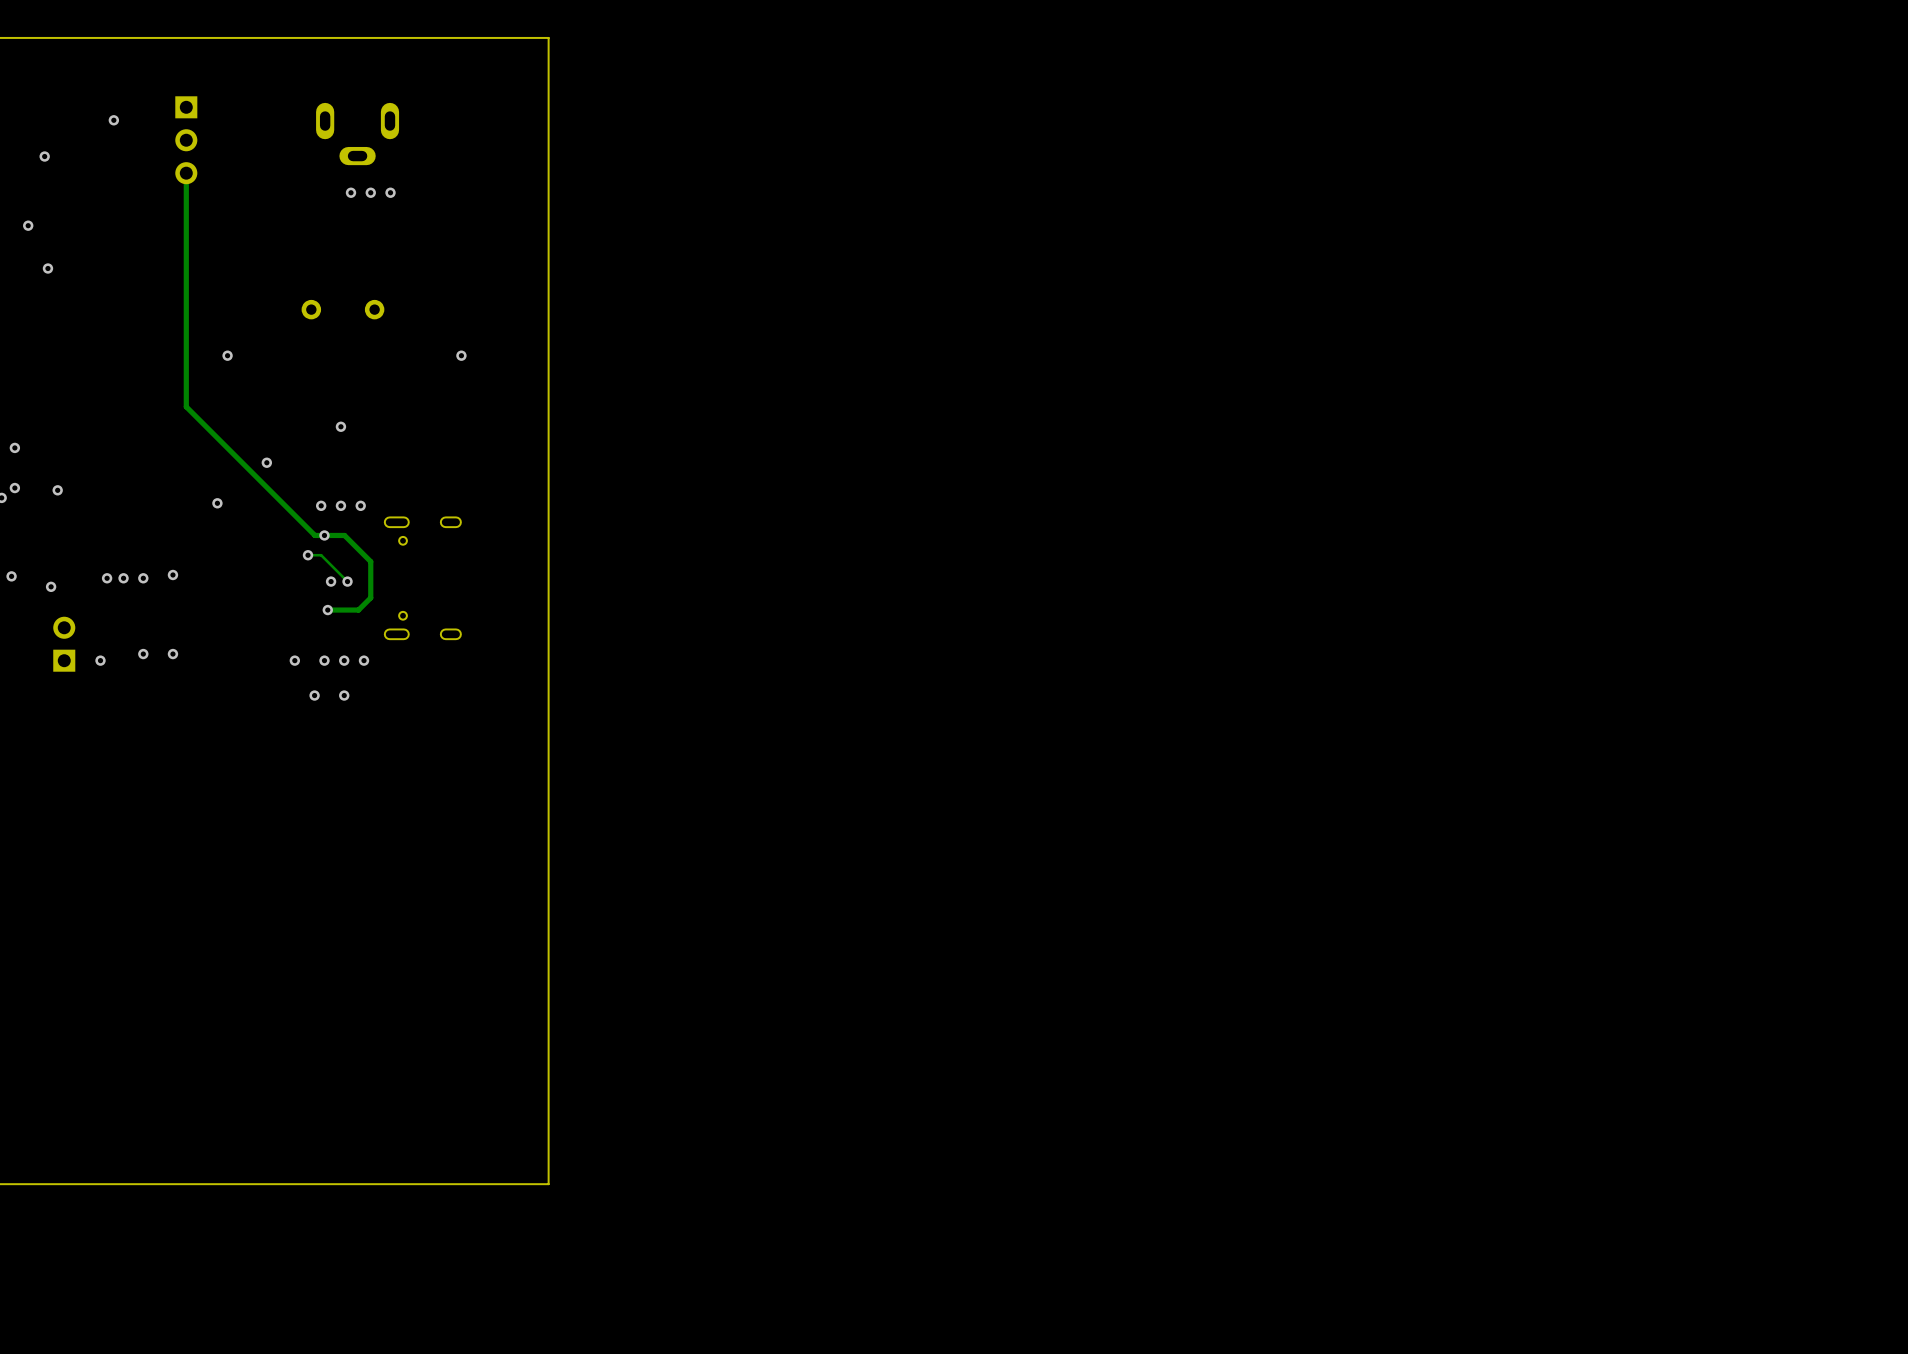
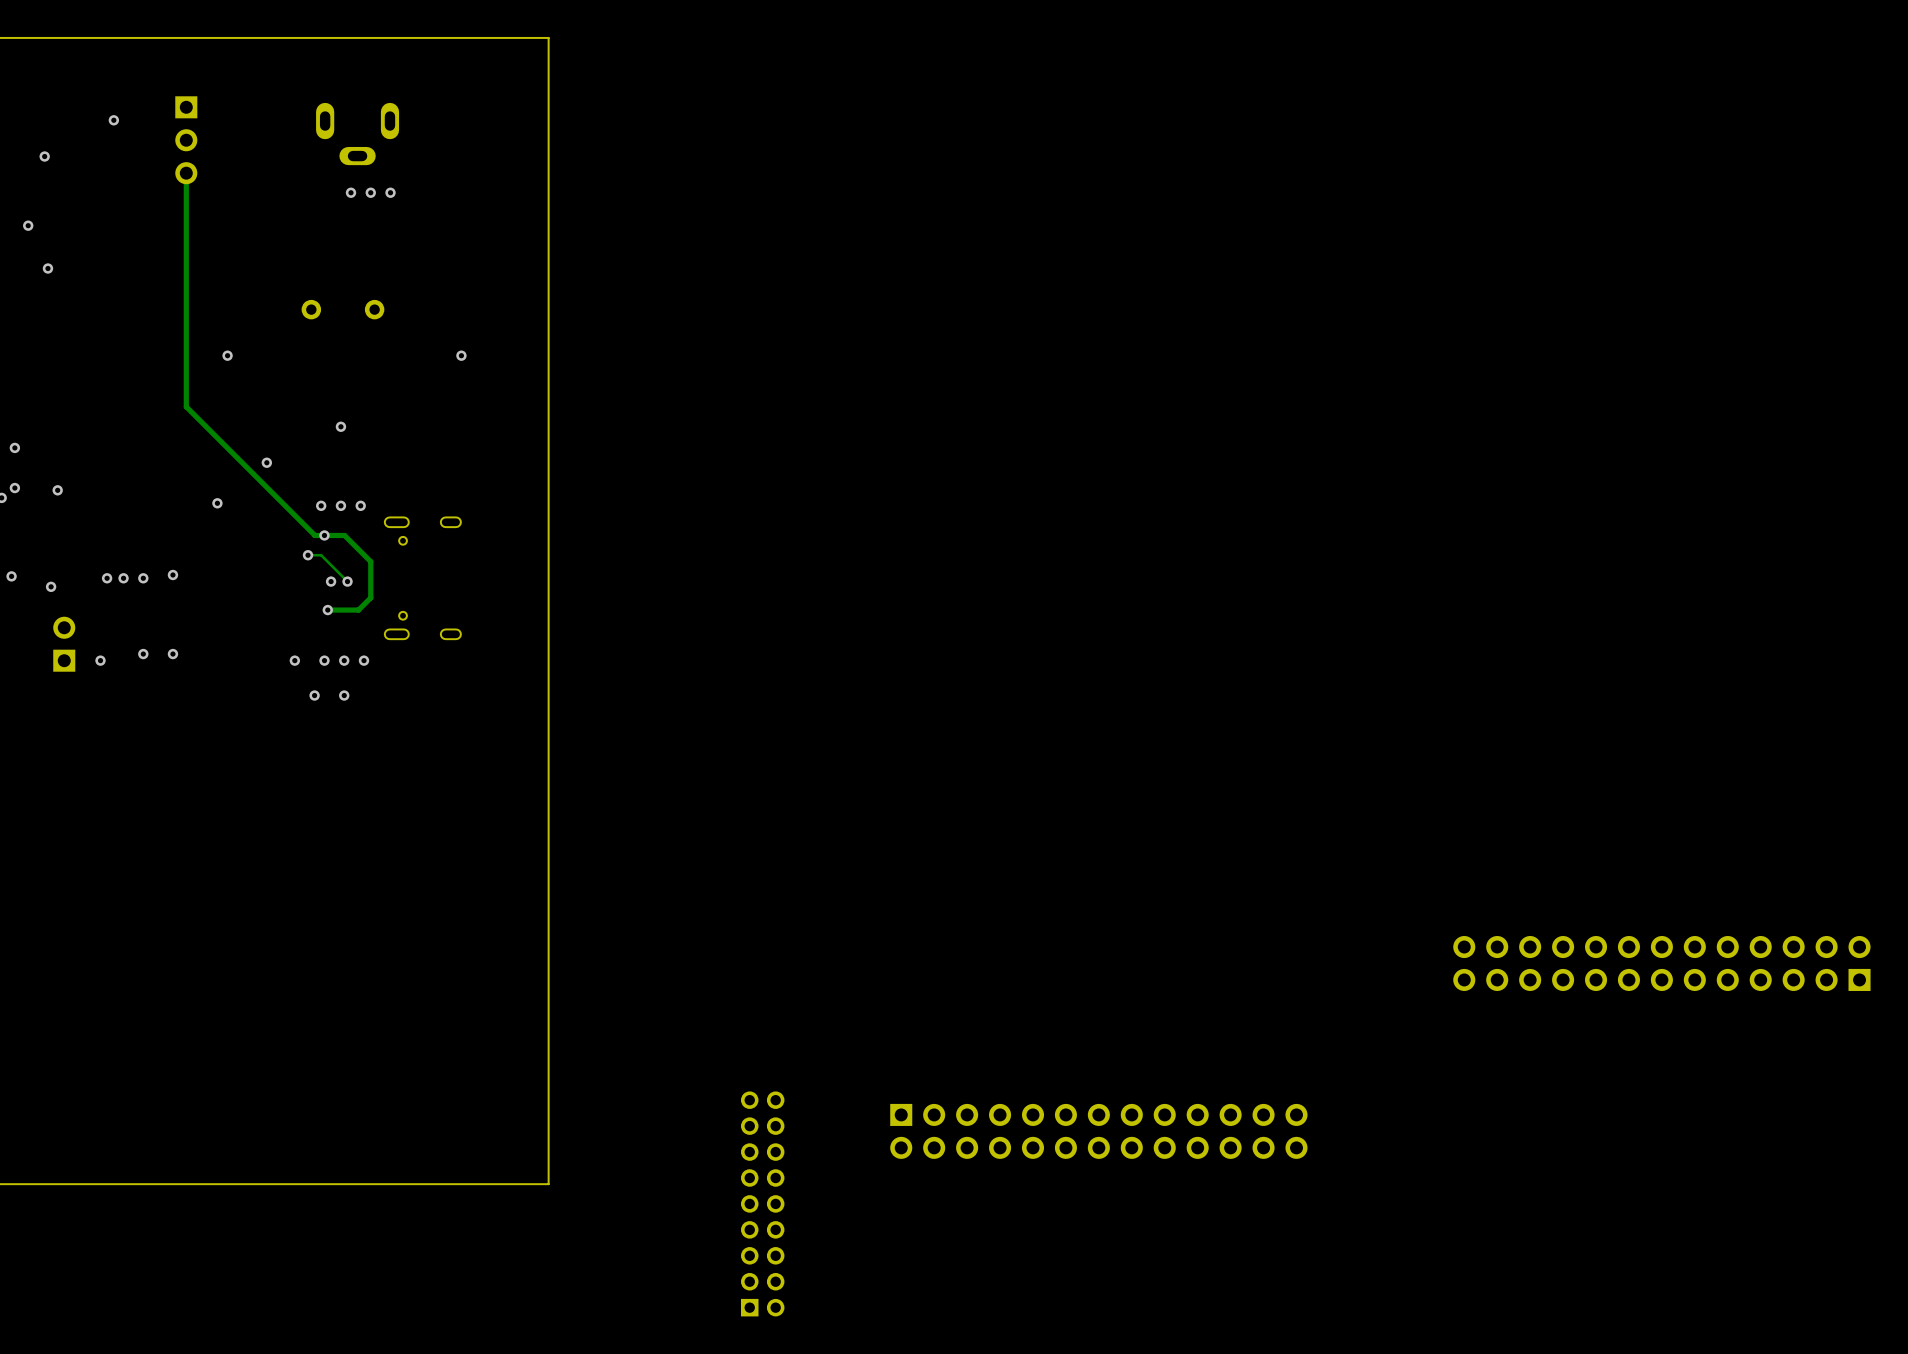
part: none -> (1661, 963)
part: none -> (1098, 1131)
part: none -> (762, 1203)

